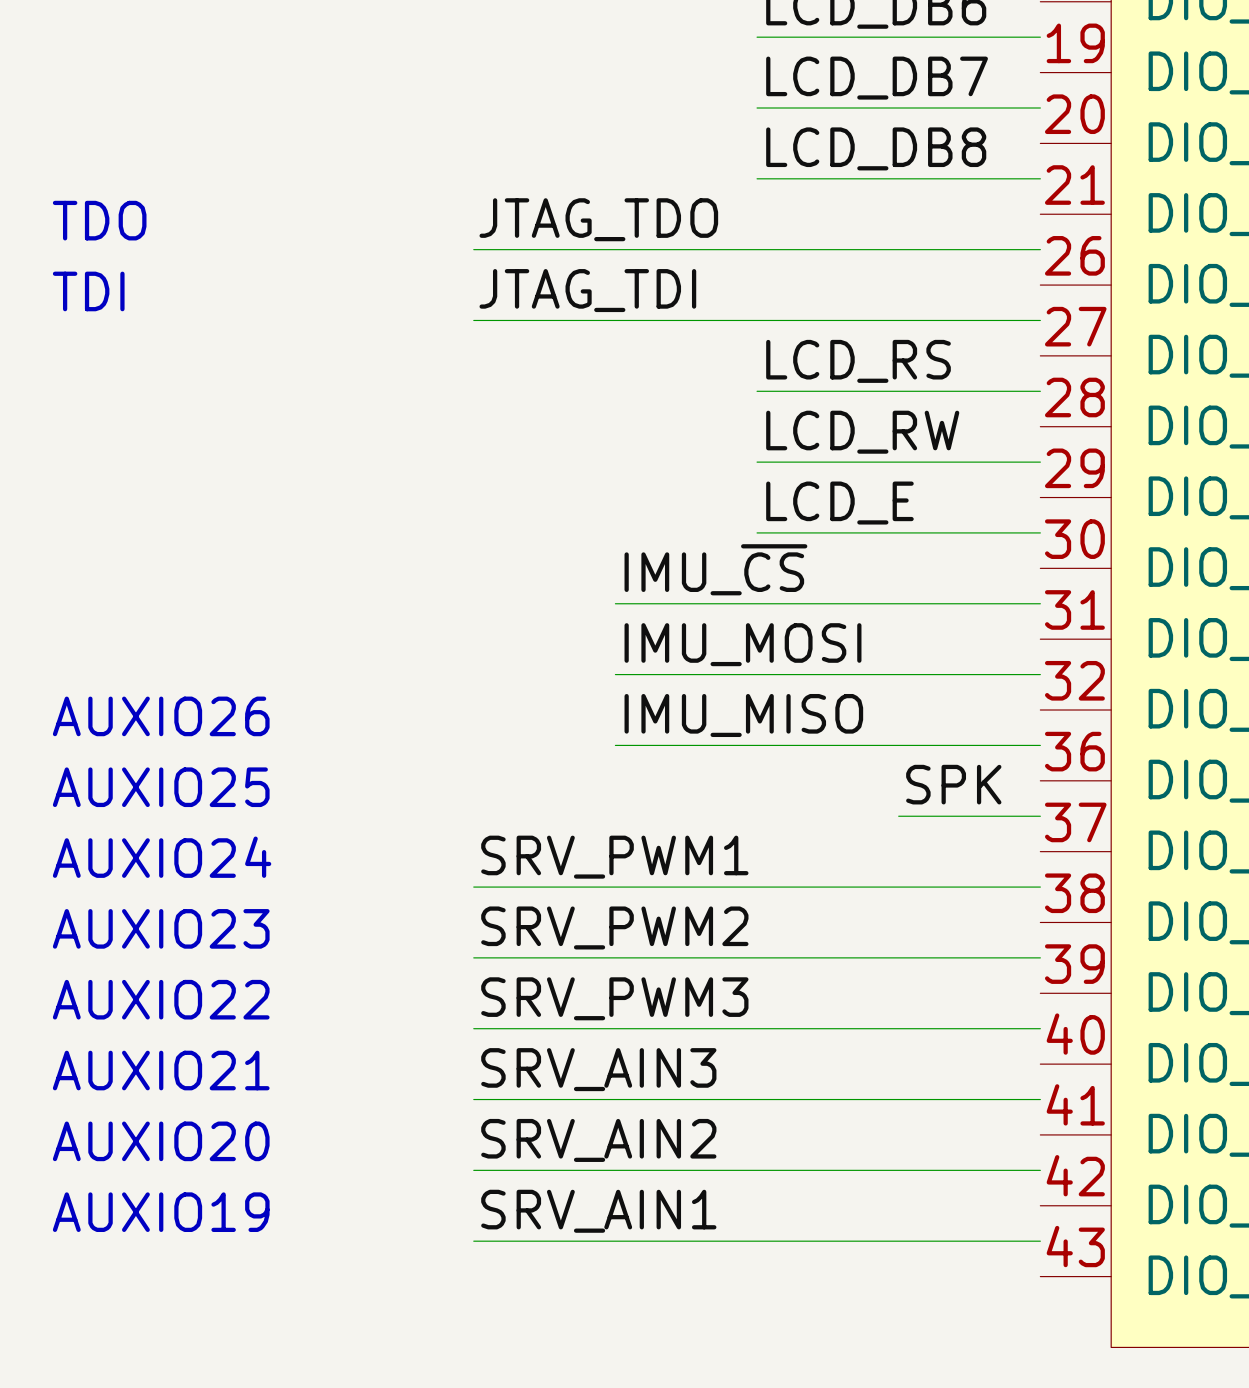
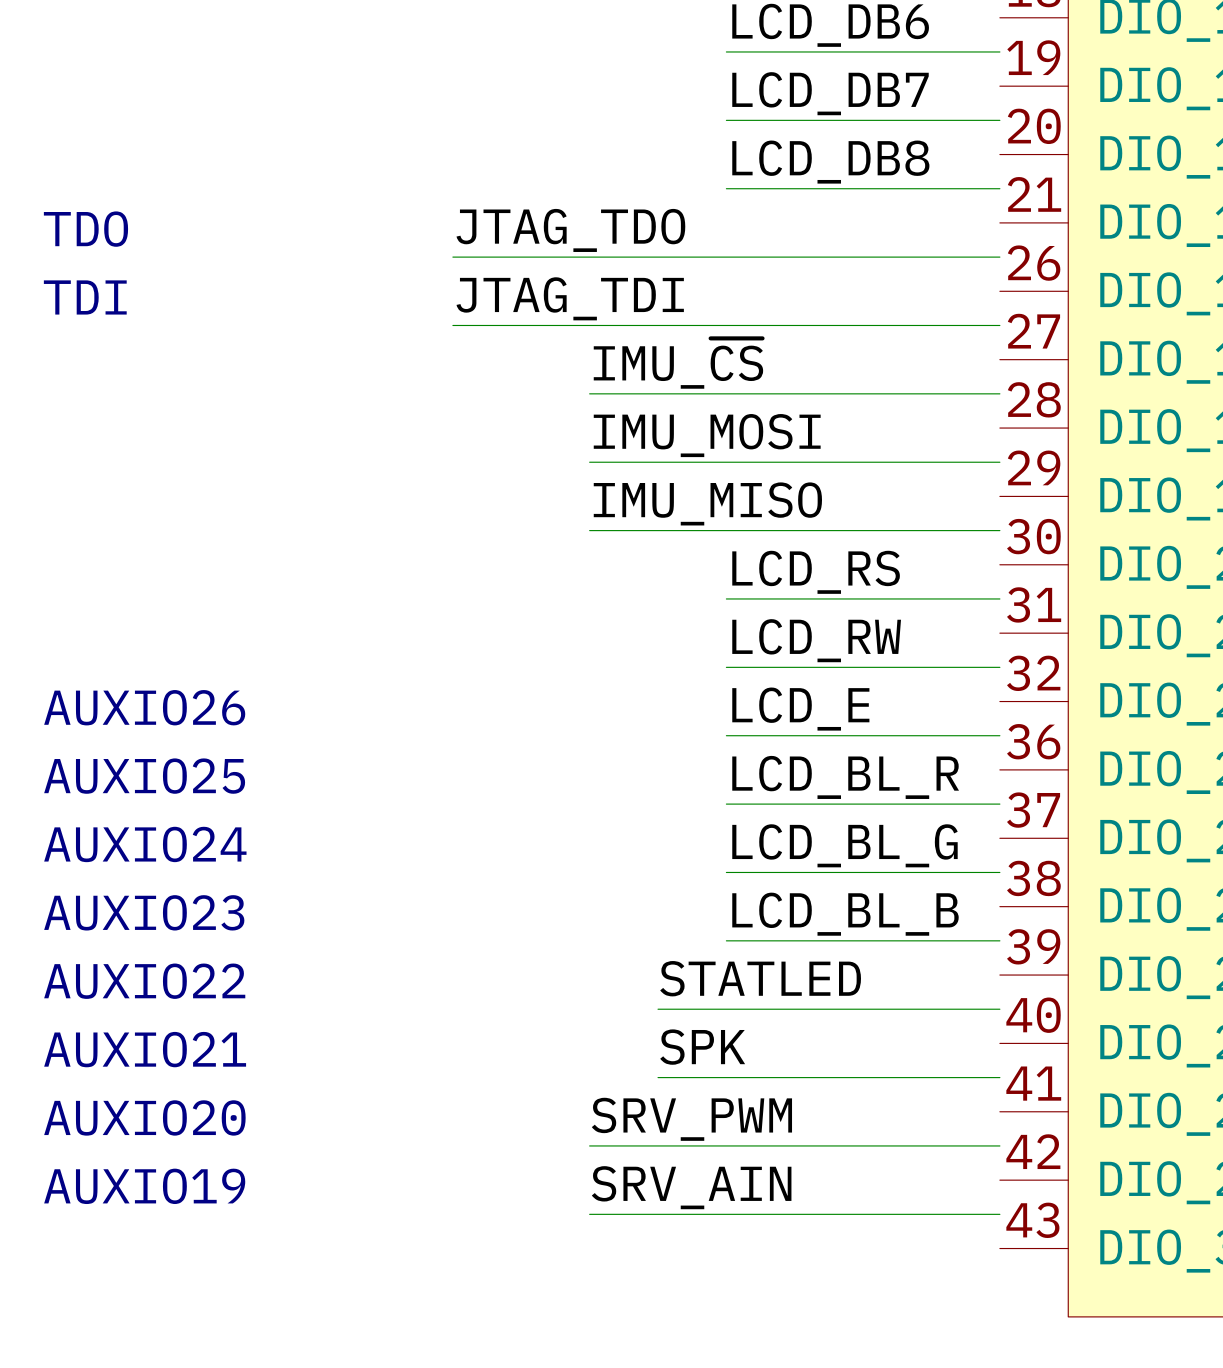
label position: LCD_RS (858, 361) -> LCD_RS (816, 572)
label position: LCD_RW (862, 432) -> LCD_RW (816, 640)
label position: LCD_E (839, 503) -> LCD_E (800, 709)
label position: IMU_~{CS} (715, 569) -> IMU_~{CS} (678, 363)
wire: (615, 603) (757, 603) -> (589, 393) (726, 393)
label position: IMU_MOSI (742, 644) -> IMU_MOSI (707, 435)
wire: (615, 674) (757, 674) -> (589, 462) (726, 462)
label position: IMU_MISO (743, 715) -> IMU_MISO (707, 503)
wire: (615, 745) (757, 745) -> (589, 530) (726, 530)
label position: SPK (953, 784) -> SPK (702, 1047)
label: none -> LCD_BL_R (845, 777)
label: SRV_PWM1 (614, 857) -> none
label: none -> LCD_BL_G (844, 845)
wire: (473, 887) (757, 887) -> none
label: SRV_PWM2 (614, 927) -> none
label: none -> LCD_BL_B (845, 914)
wire: (473, 957) (757, 957) -> none
label: none -> STATLED (760, 978)
label: SRV_PWM3 (614, 998) -> none
wire: (473, 1028) (686, 1028) -> none
label: SRV_AIN3 (598, 1069) -> none
wire: (473, 1099) (686, 1099) -> none
label: SRV_AIN2 (598, 1140) -> none
label: none -> SRV_PWM (691, 1119)
wire: (473, 1170) (615, 1170) -> (726, 804) (863, 804)
label: SRV_AIN1 (598, 1211) -> none
label: none -> SRV_AIN (691, 1187)
wire: (473, 1241) (615, 1241) -> none

